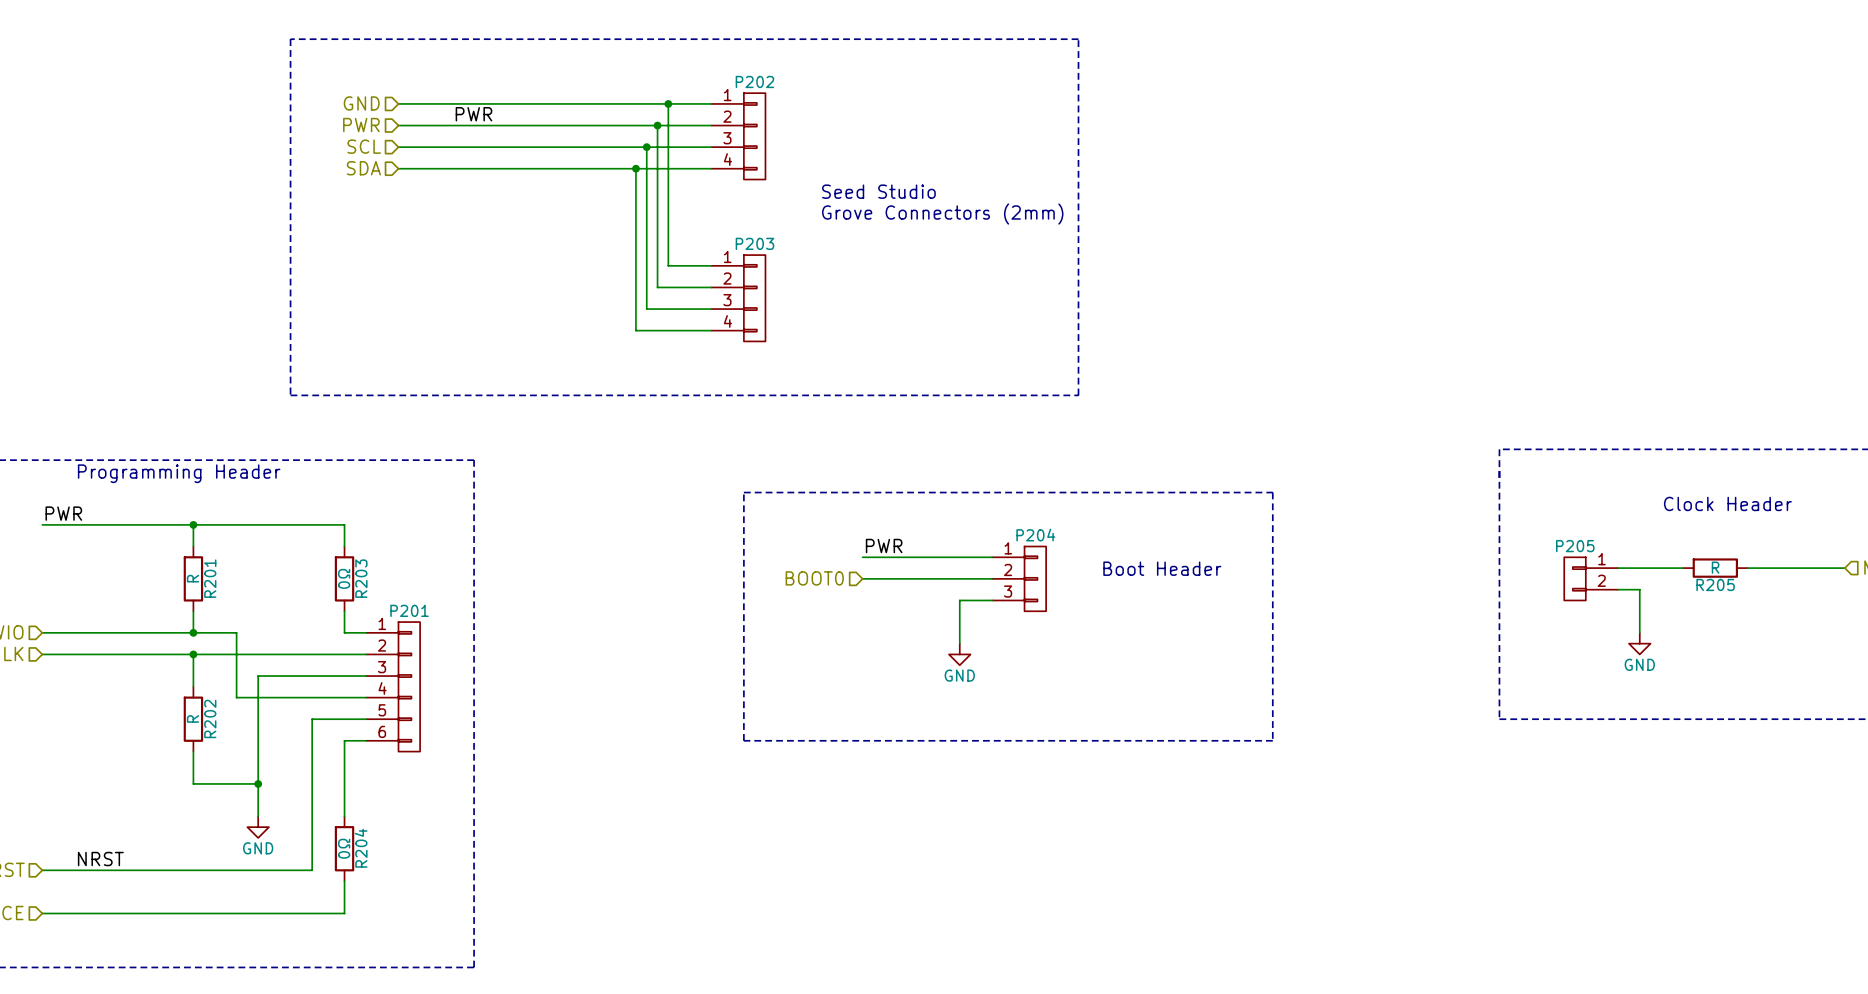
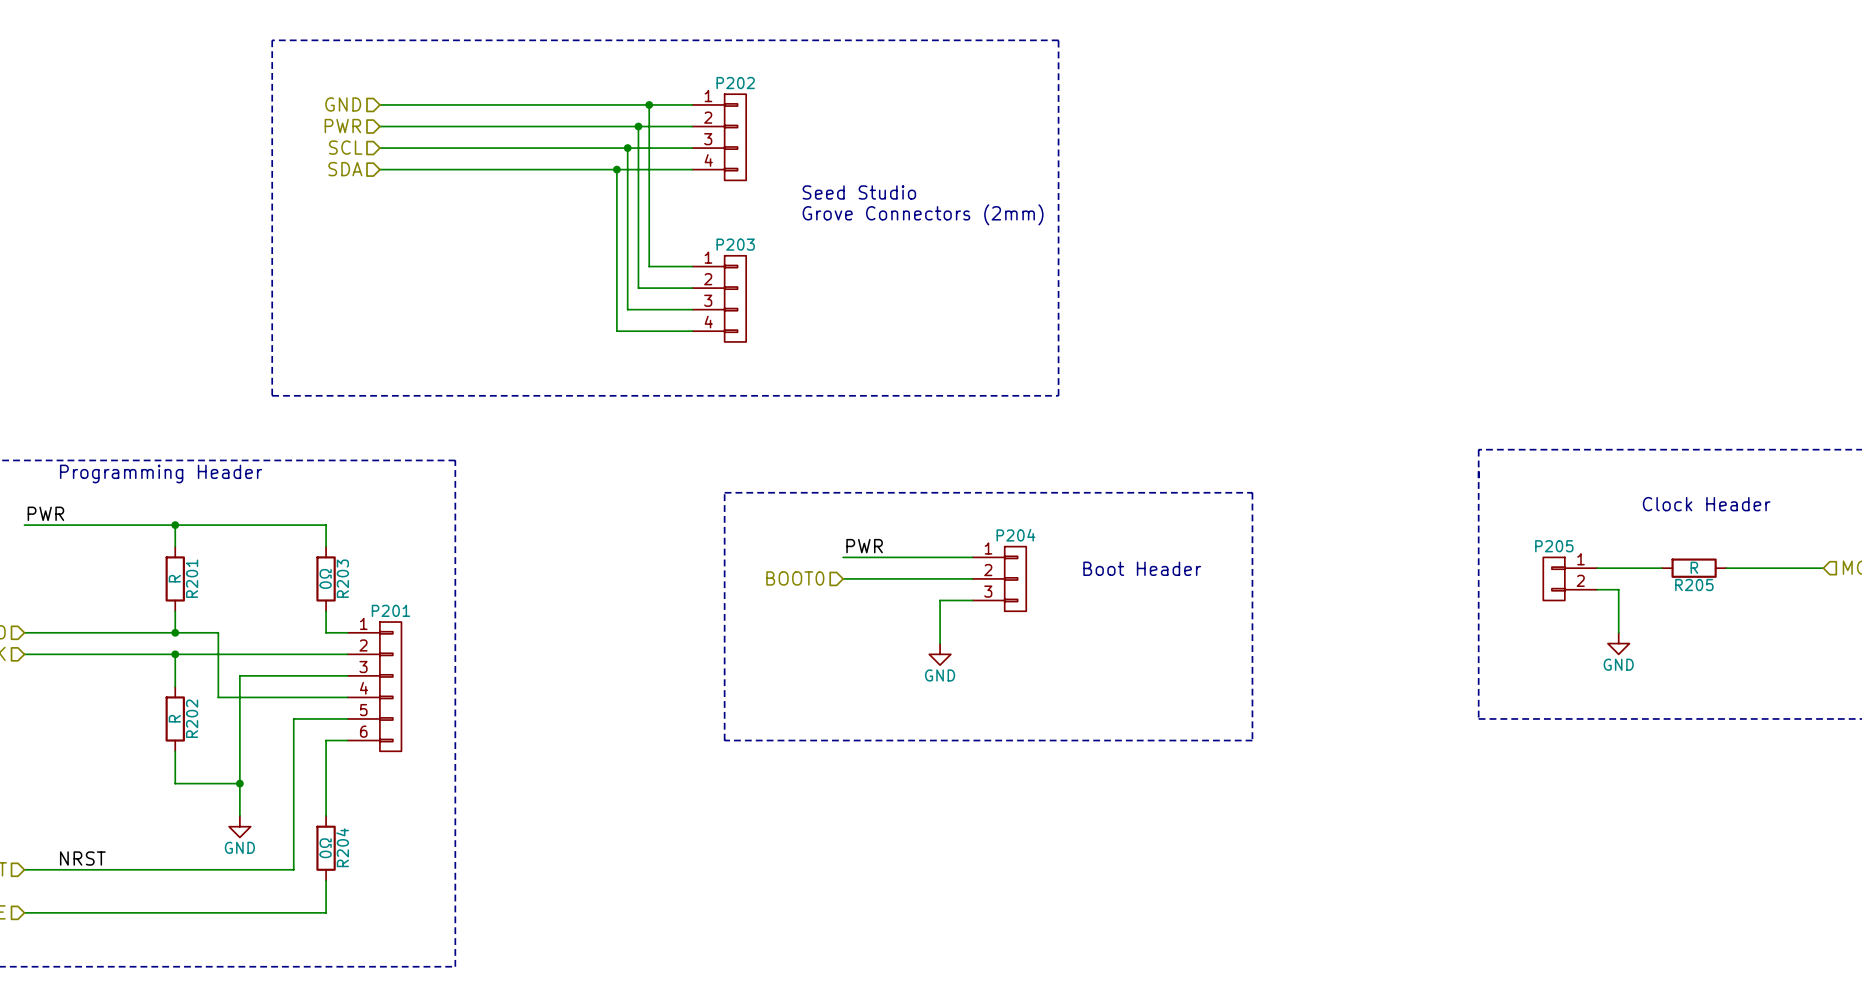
label: PWR (473, 114) -> none

